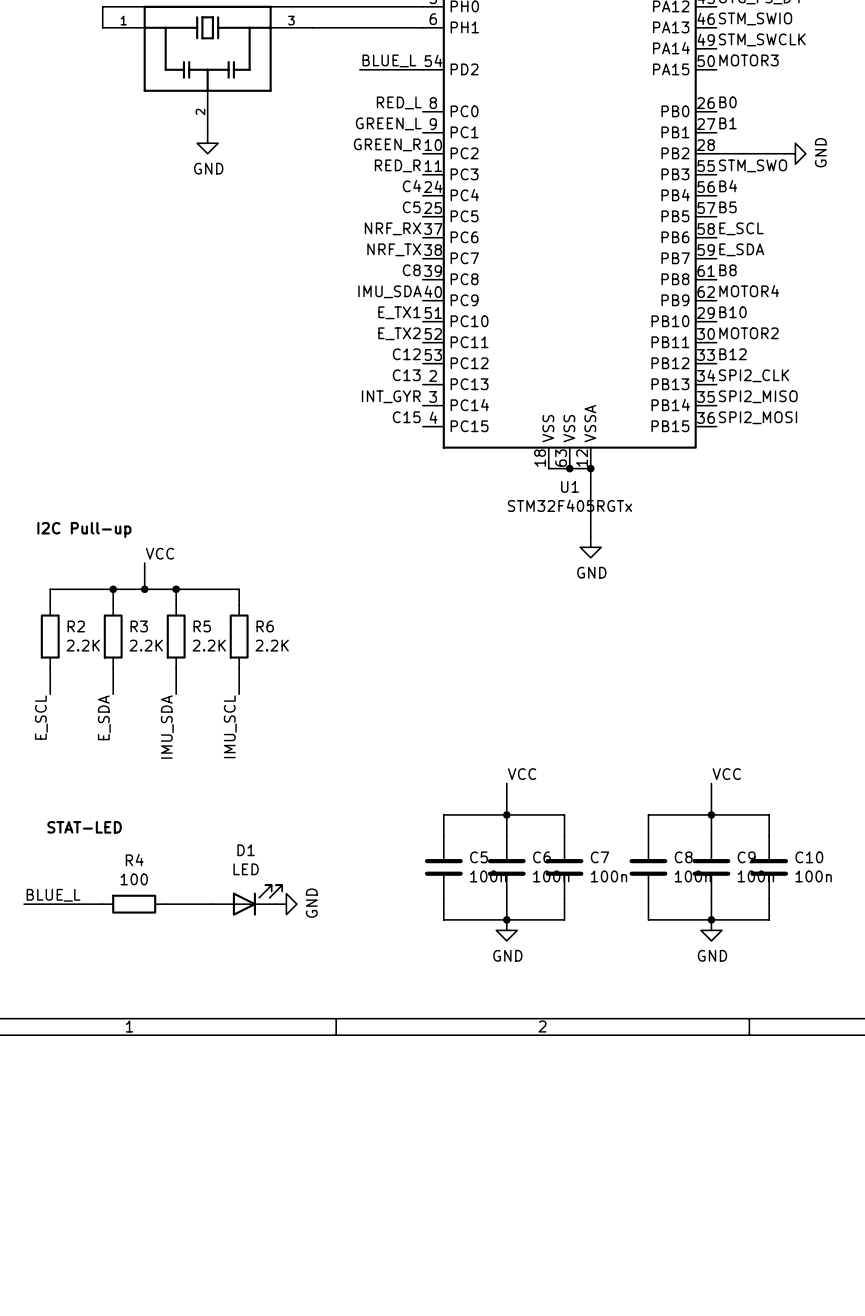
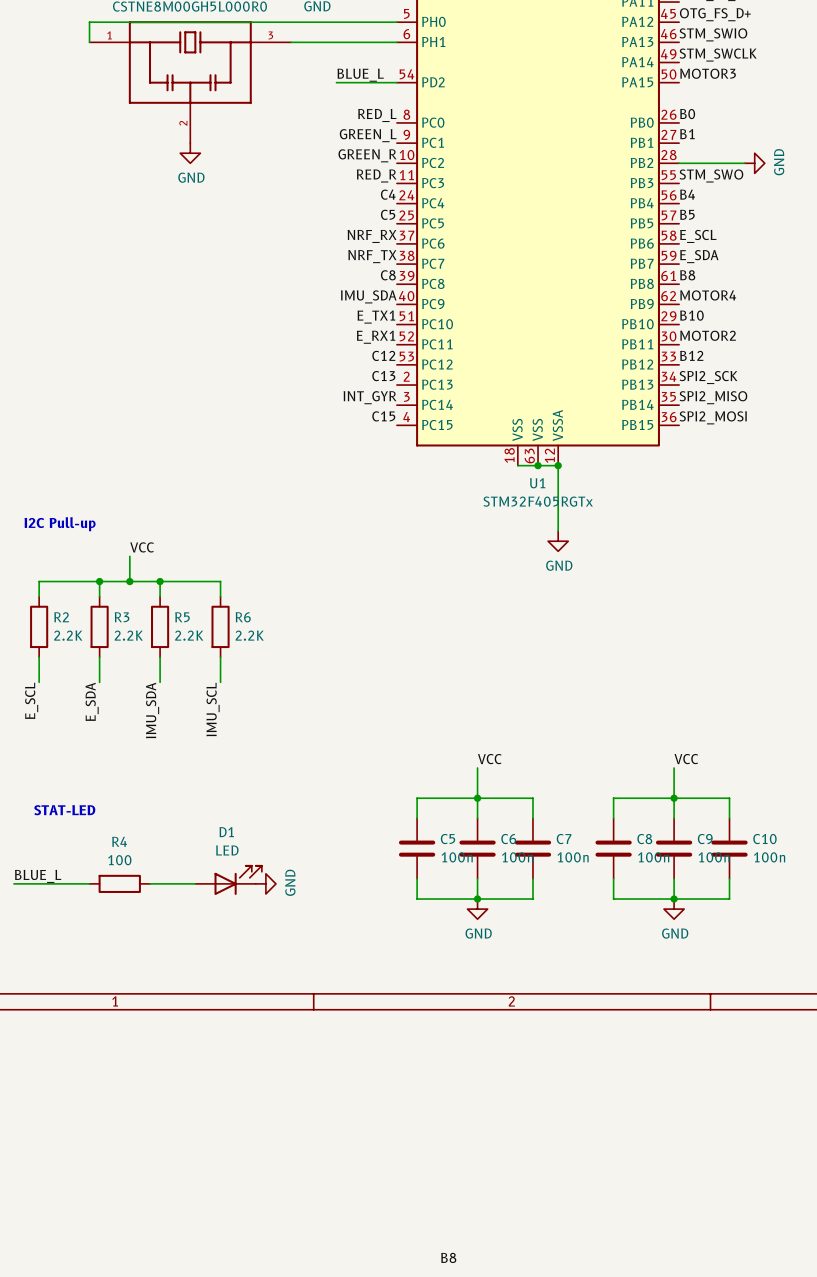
label: E_TX2 (399, 333) -> E_RX1 (376, 337)
label: SPI2_CLK (753, 375) -> SPI2_SCK (708, 377)
label: none -> B8 (448, 1257)

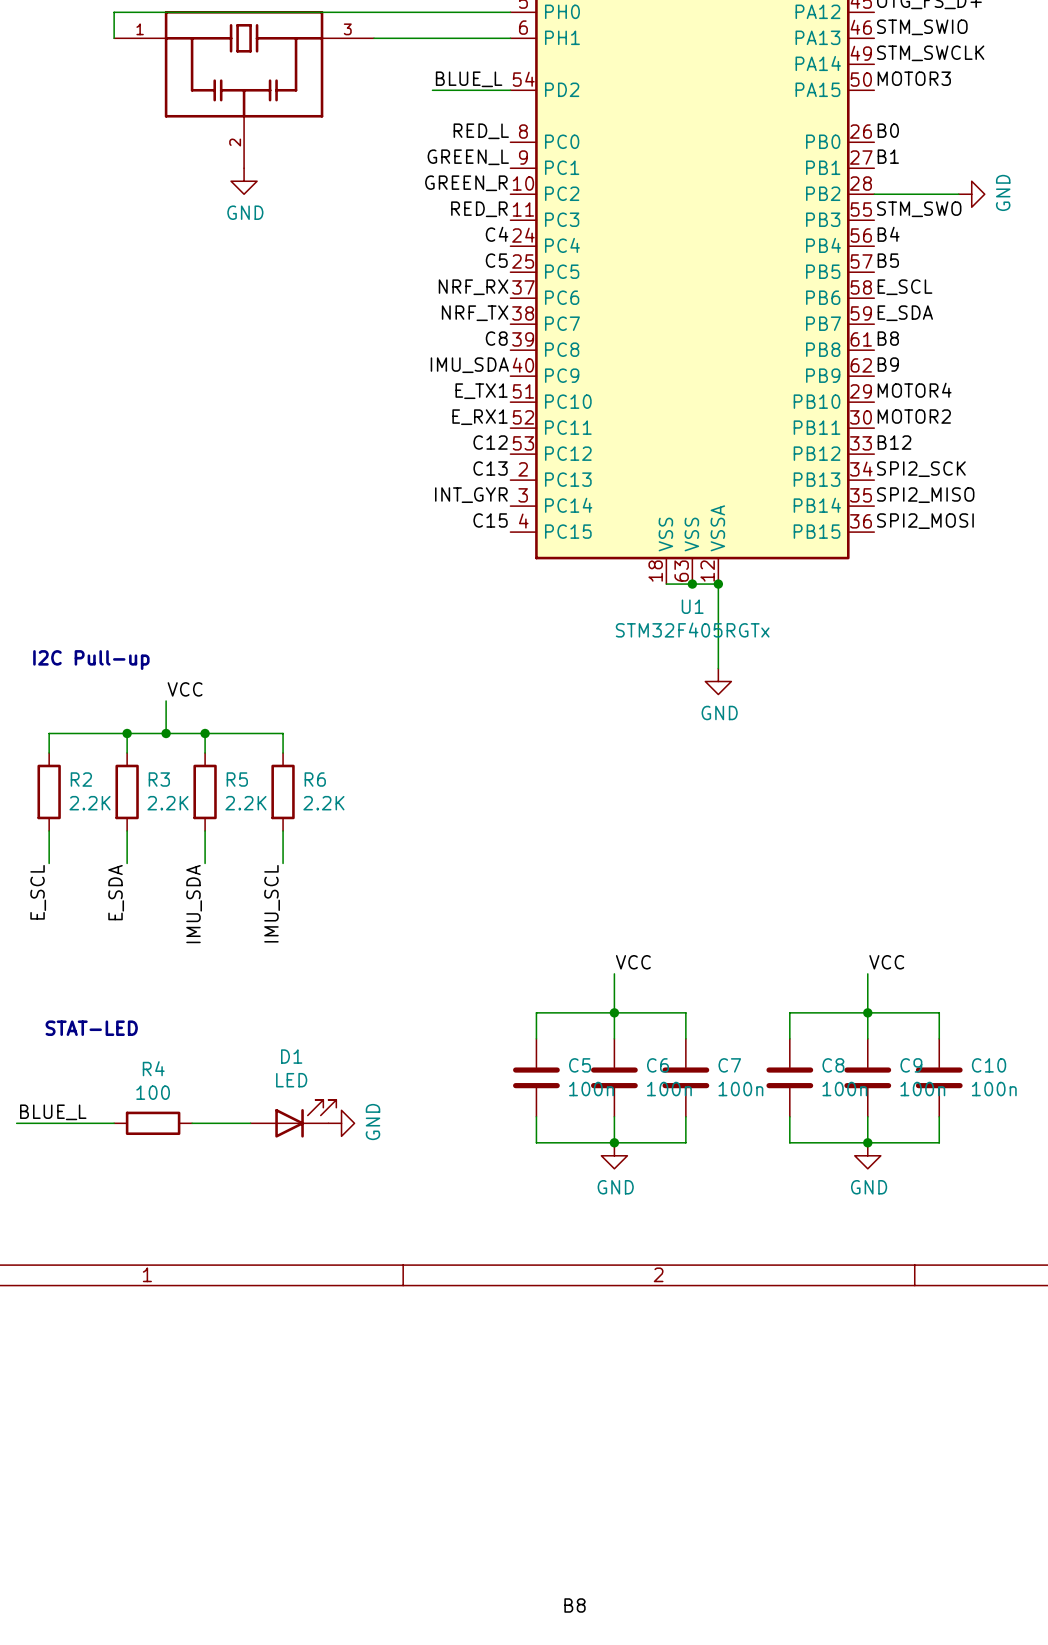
label: MOTOR4 (708, 295) -> B9 (888, 364)
label: B10 (691, 315) -> MOTOR4 (914, 390)

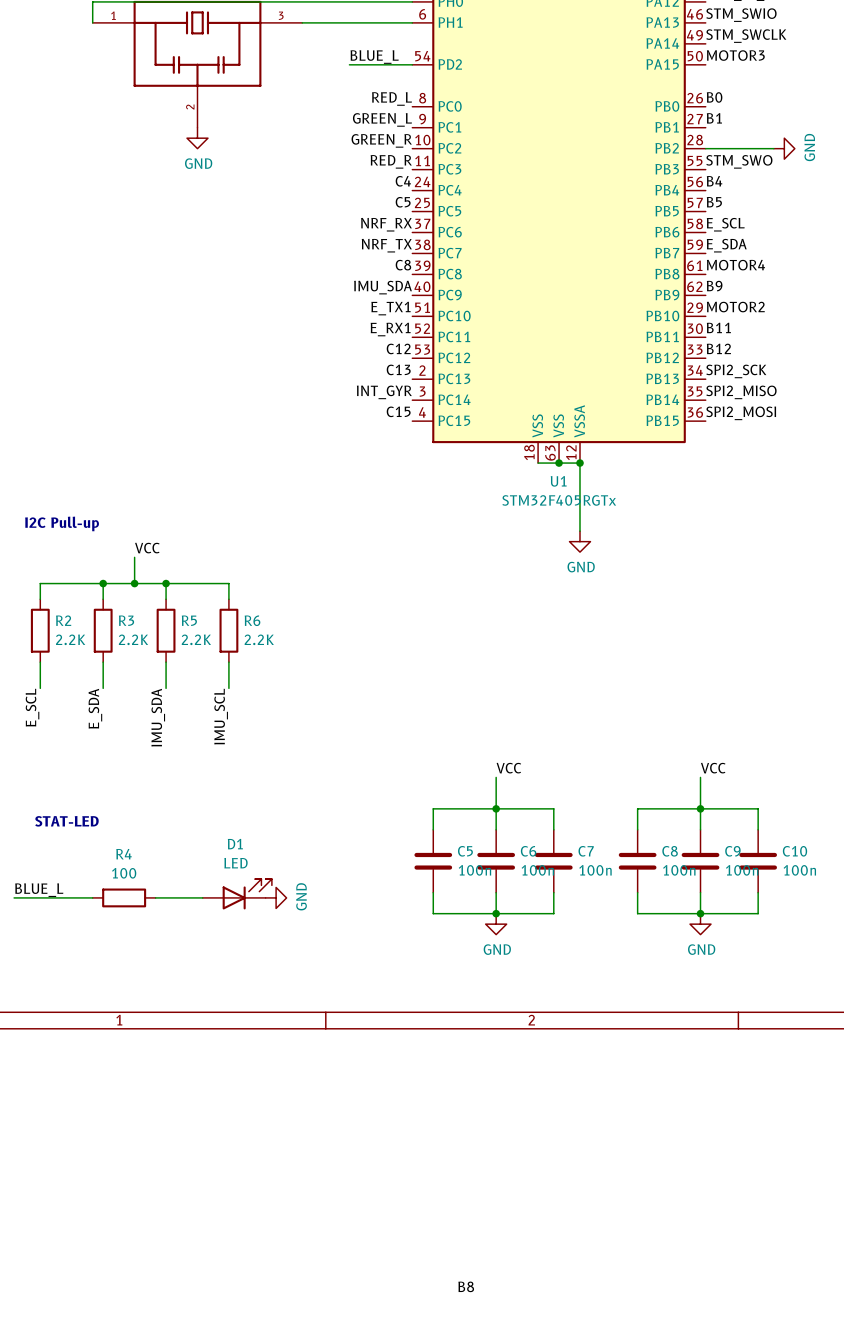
label: B8 (888, 338) -> MOTOR4 (735, 265)
label: MOTOR4 (914, 390) -> MOTOR2 (735, 307)
label: MOTOR2 (914, 416) -> B11 (718, 327)

